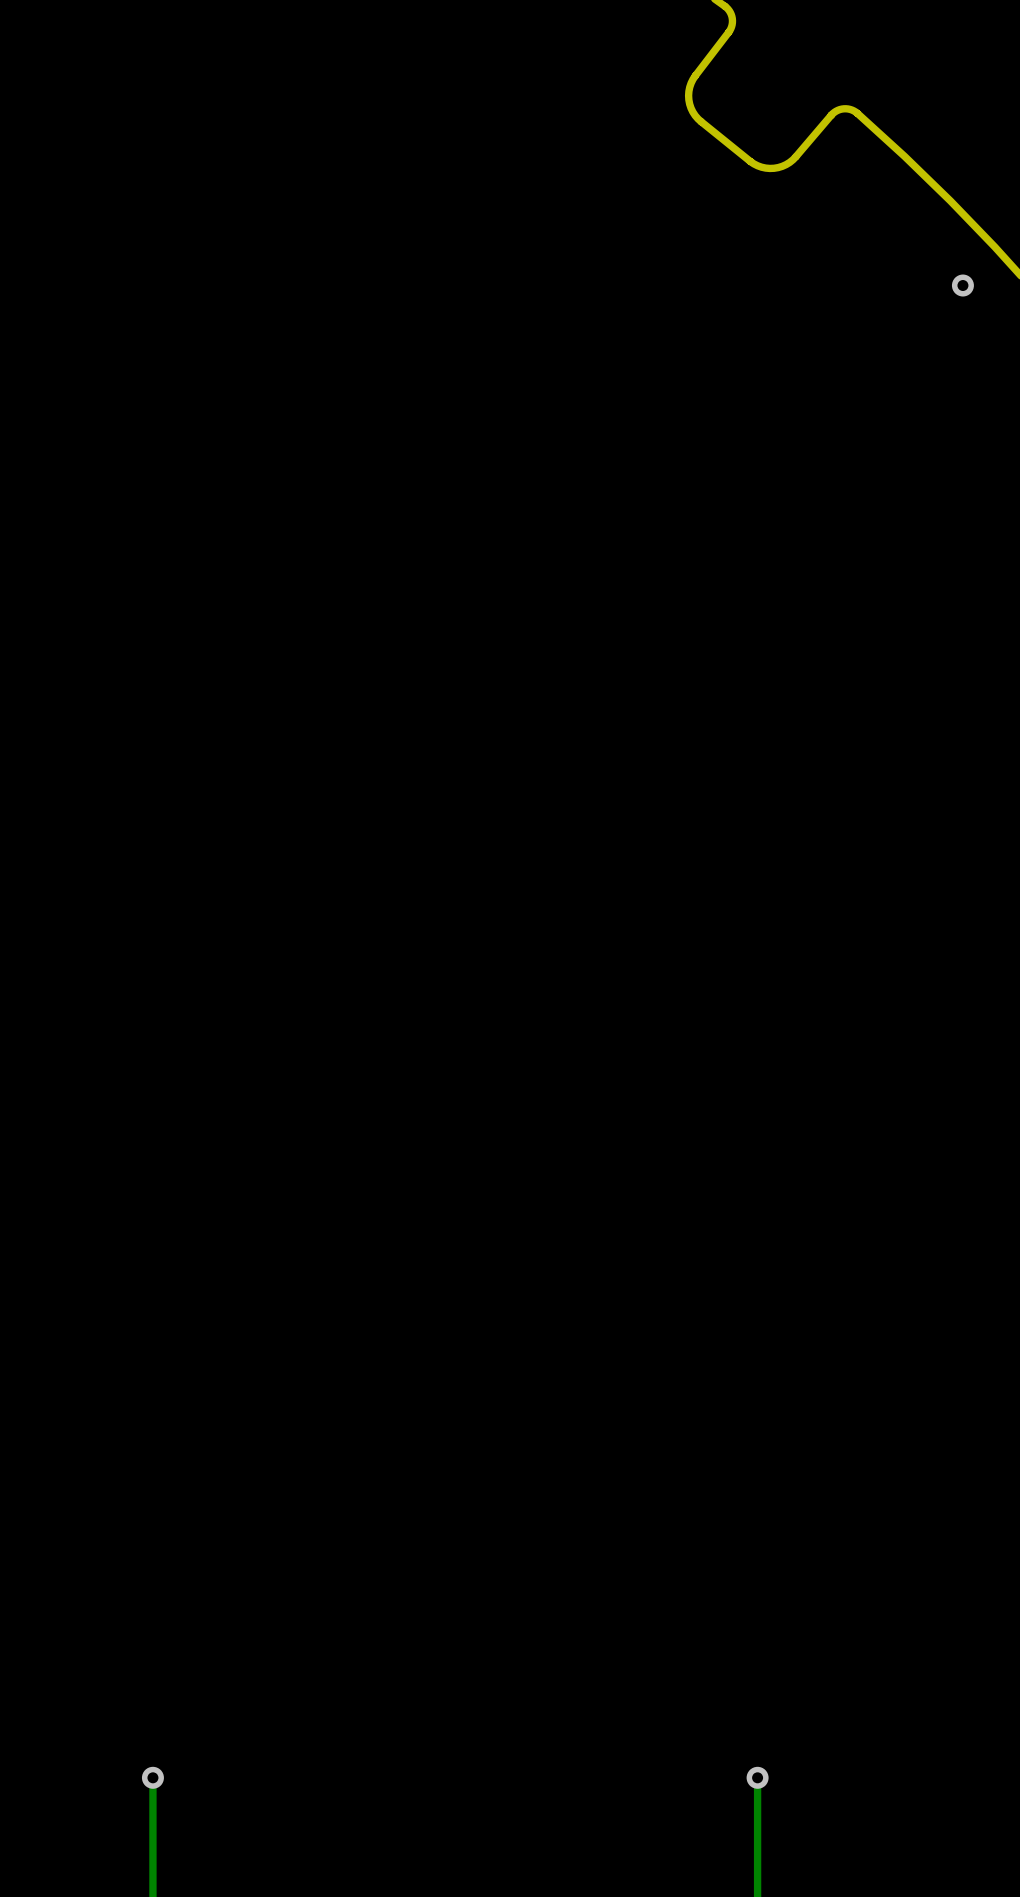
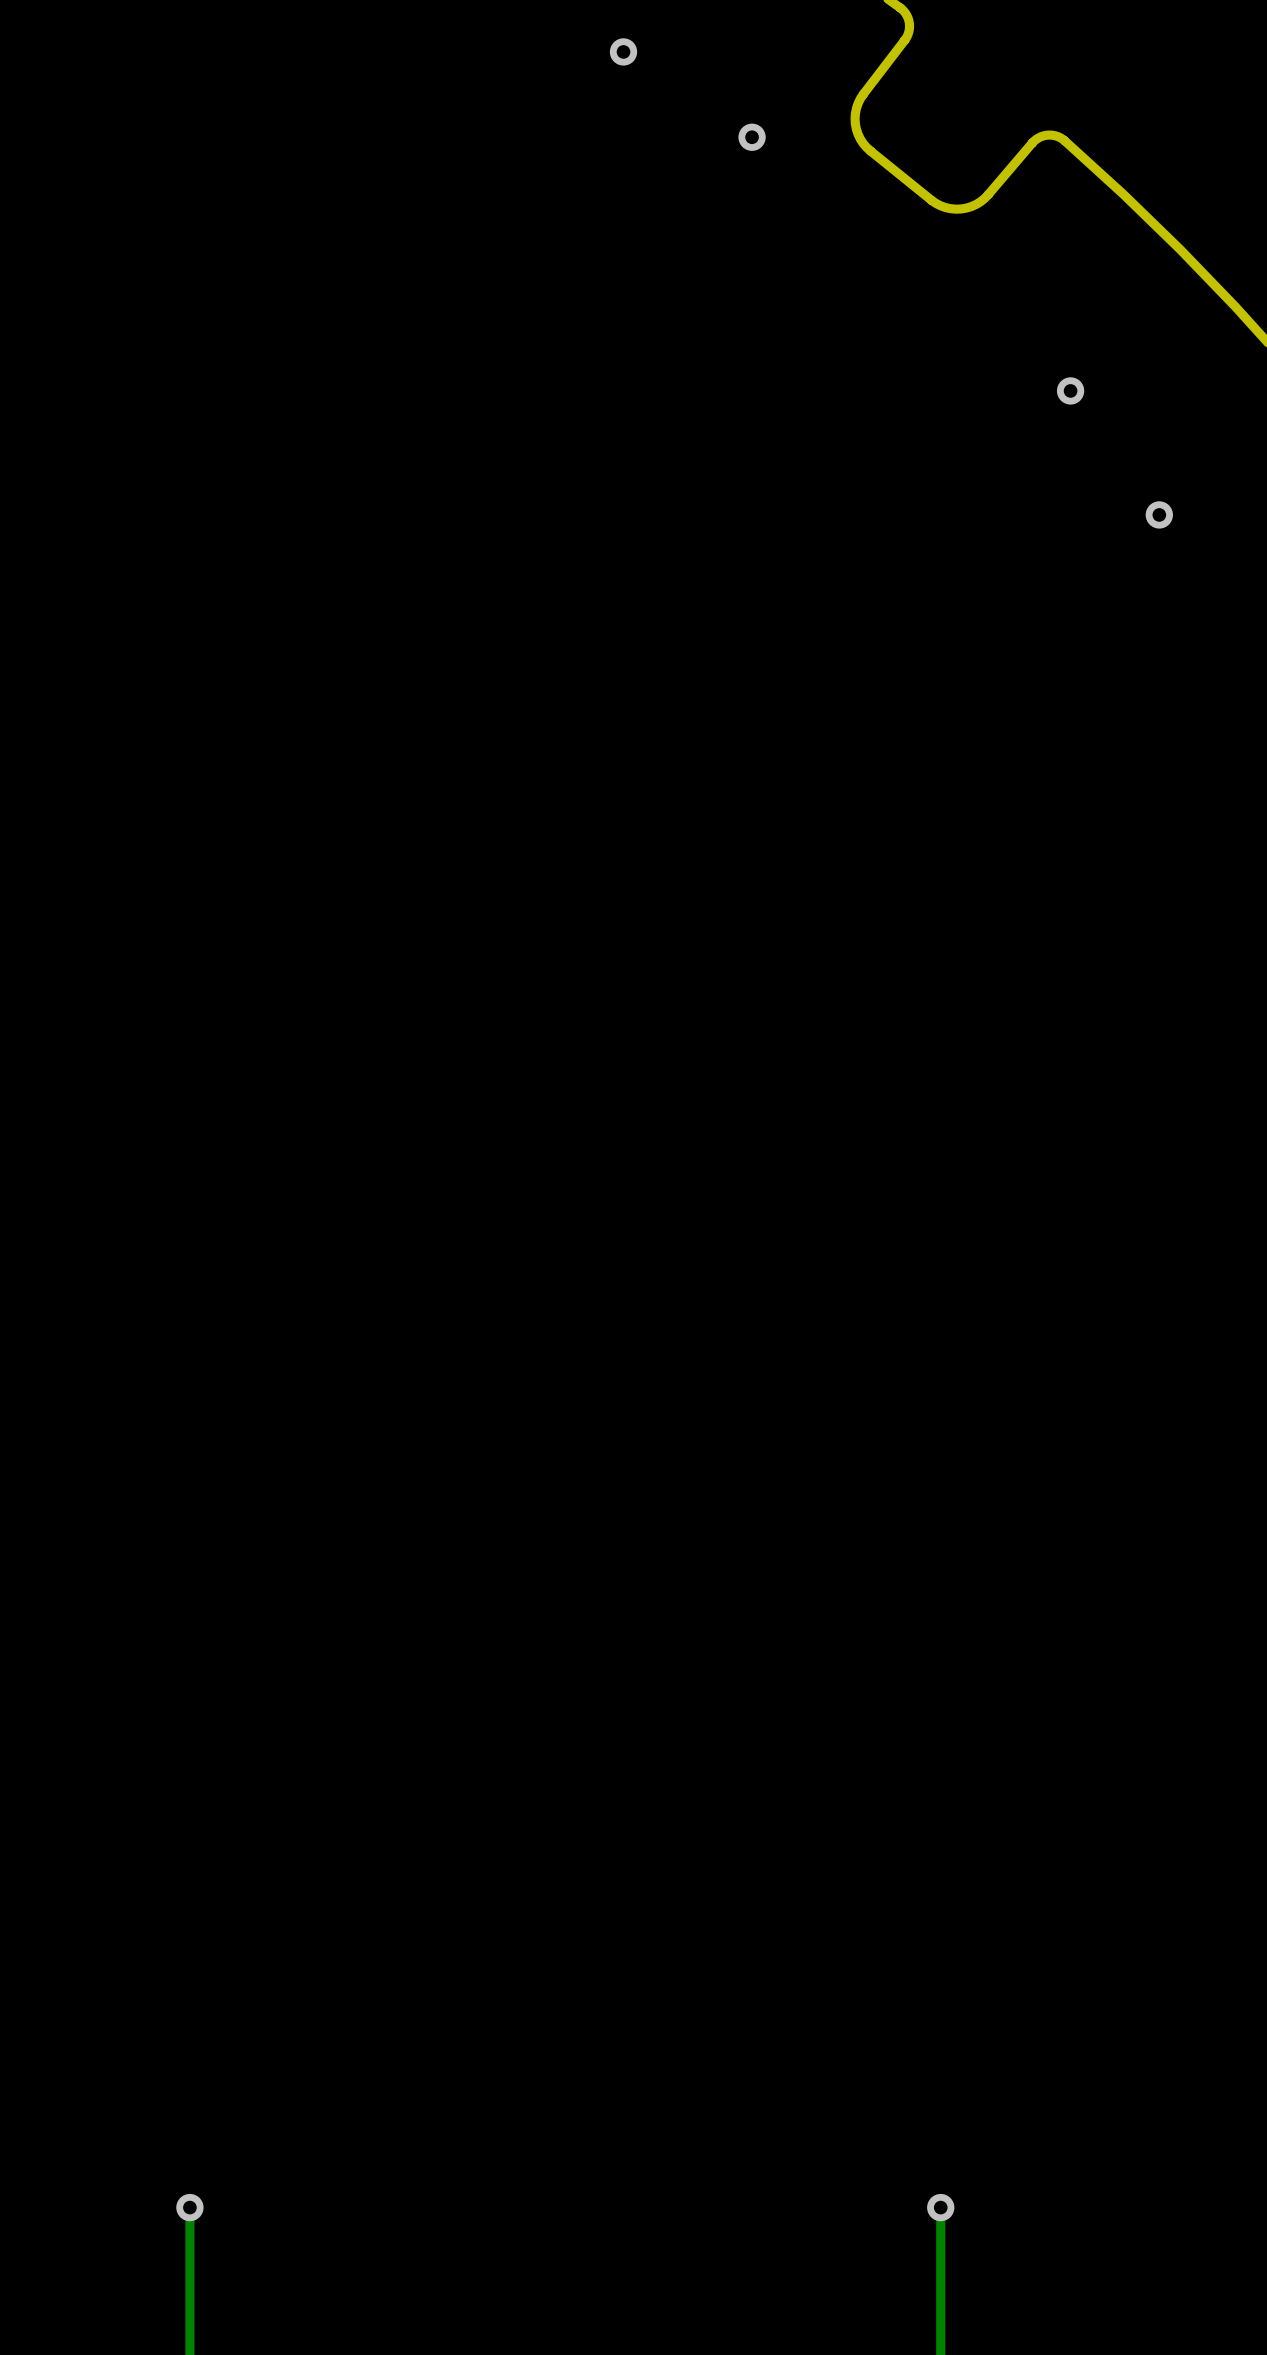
via: none -> (623, 51)
via: none -> (752, 137)
via: (962, 285) -> none
via: none -> (1070, 390)
via: none -> (1159, 514)

